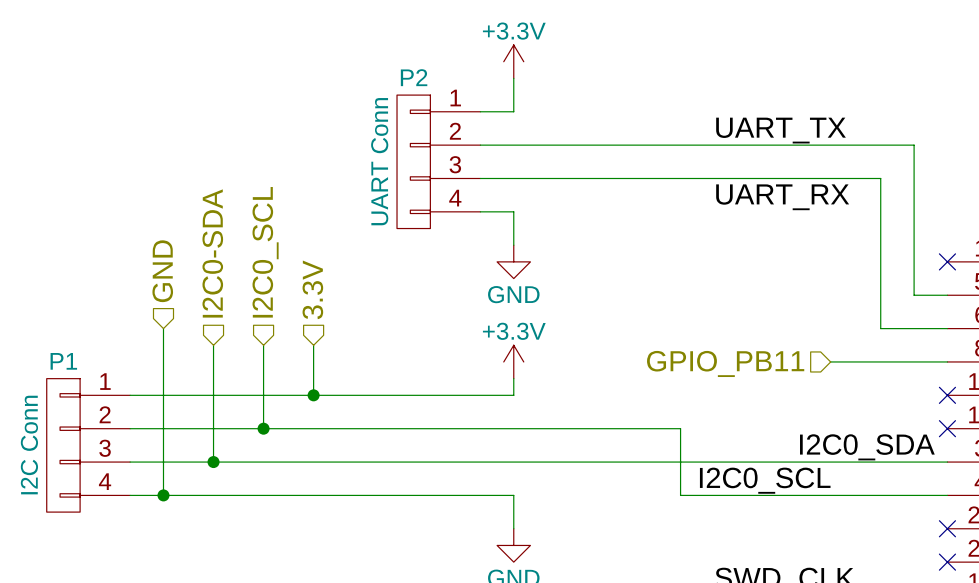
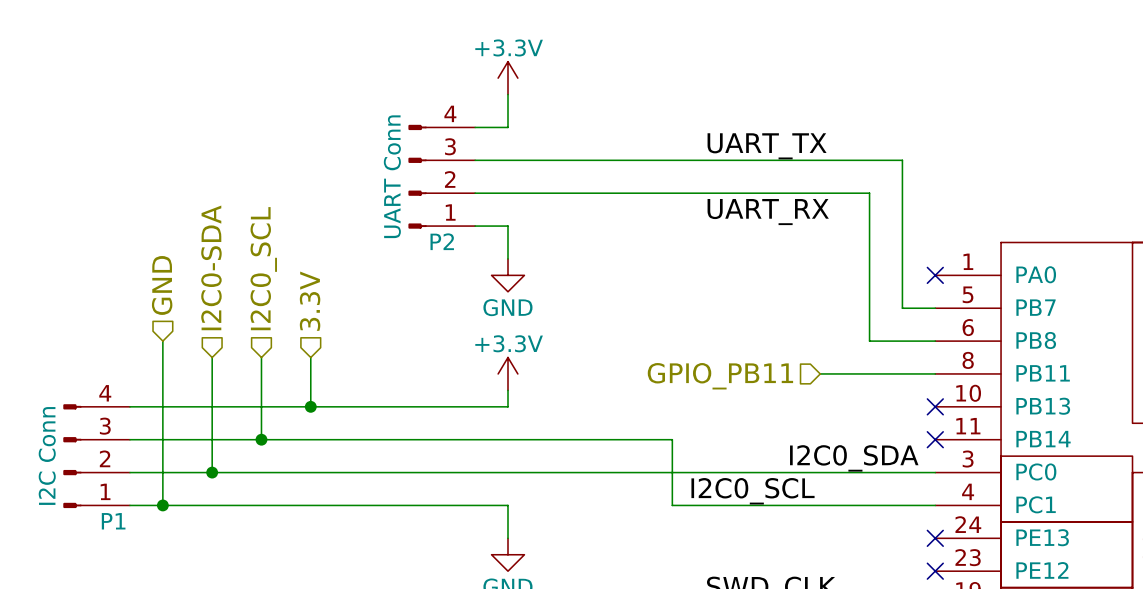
P2 name position: P2 (414, 77) -> P2 (442, 241)
P2 symbol: [397, 95, 481, 229] -> [408, 124, 476, 229]
P1 name position: P1 (63, 361) -> P1 (113, 521)
P1 symbol: [46, 378, 131, 513] -> [63, 404, 131, 509]

